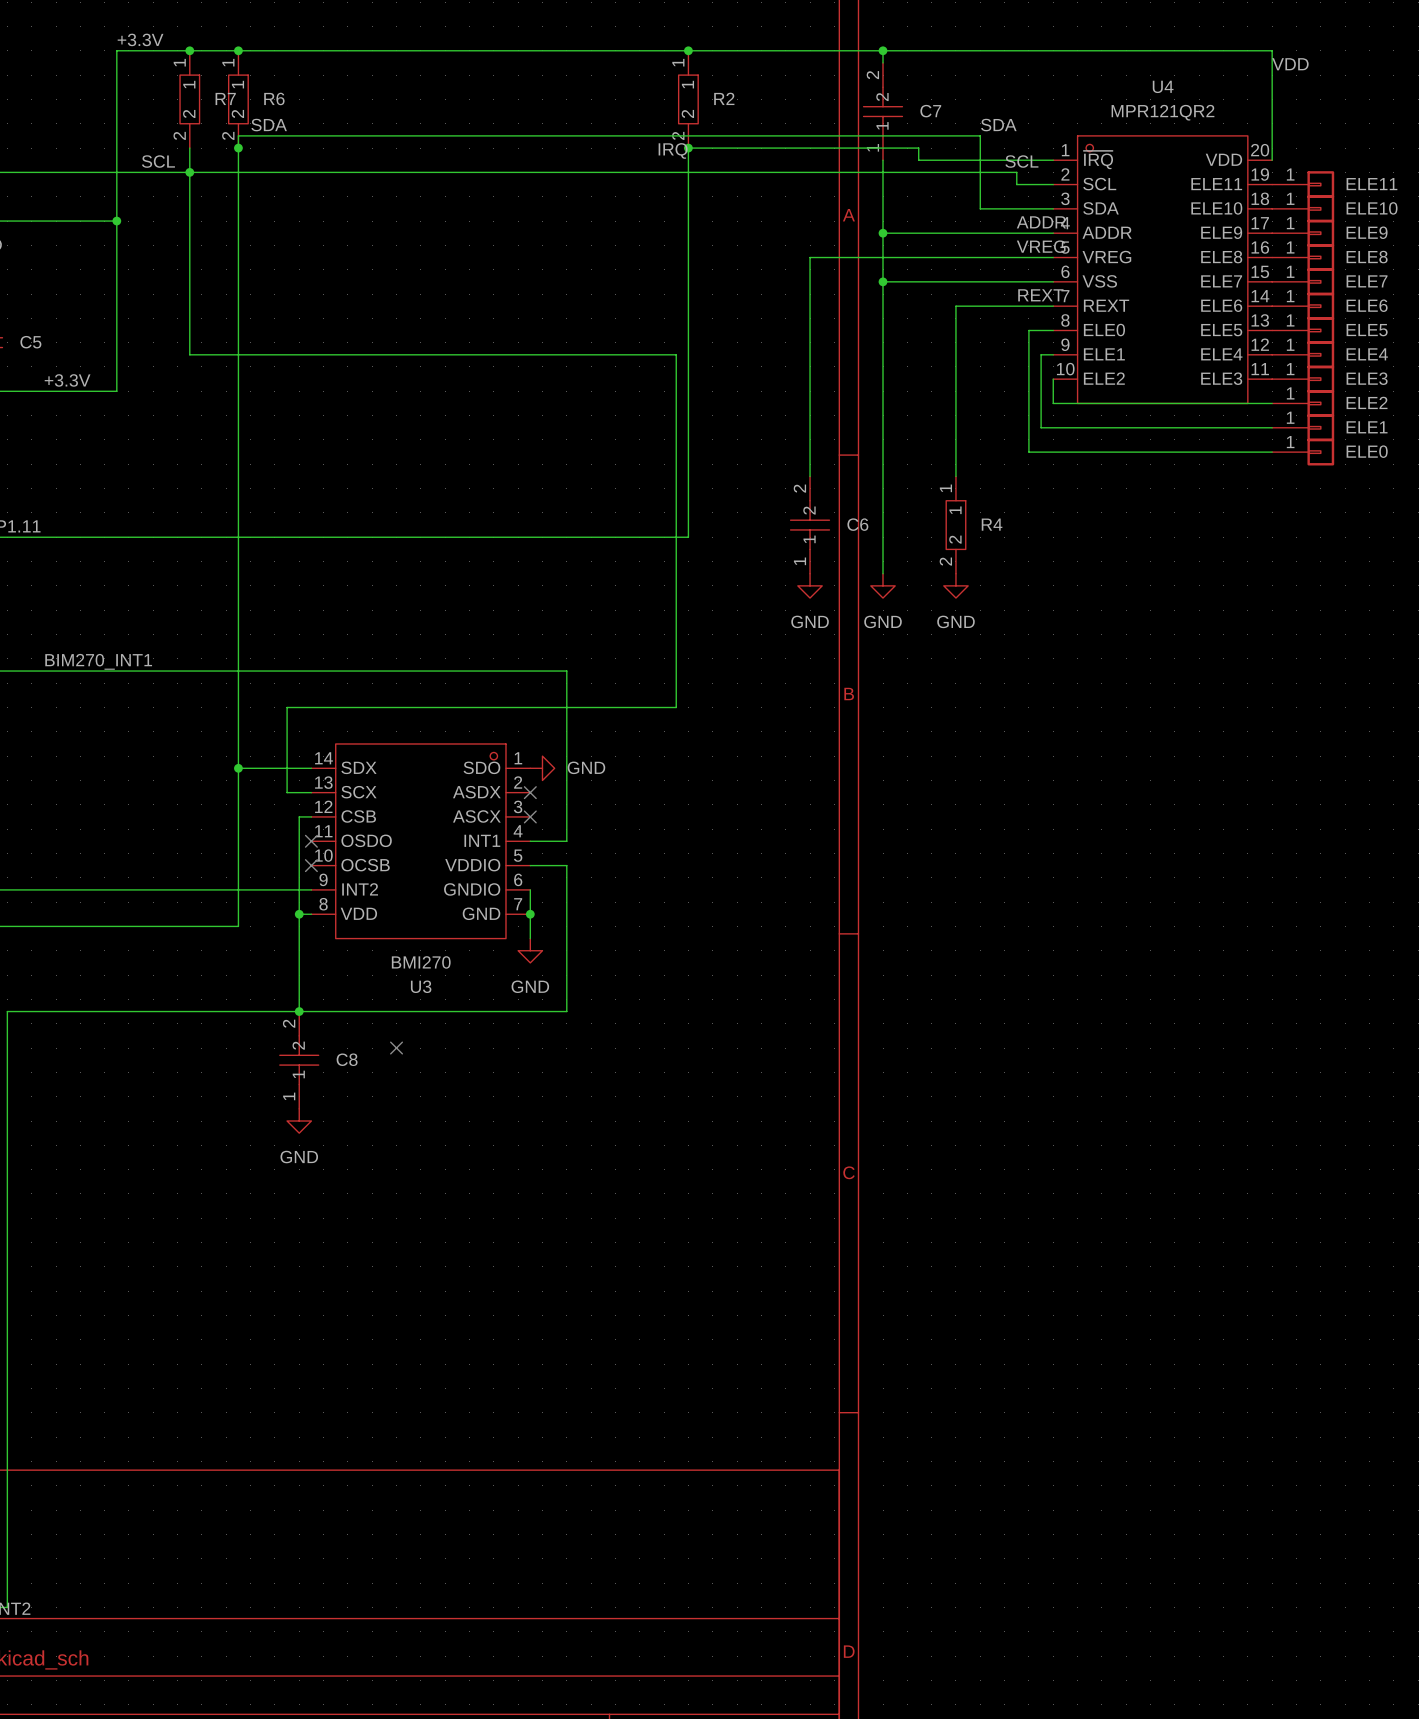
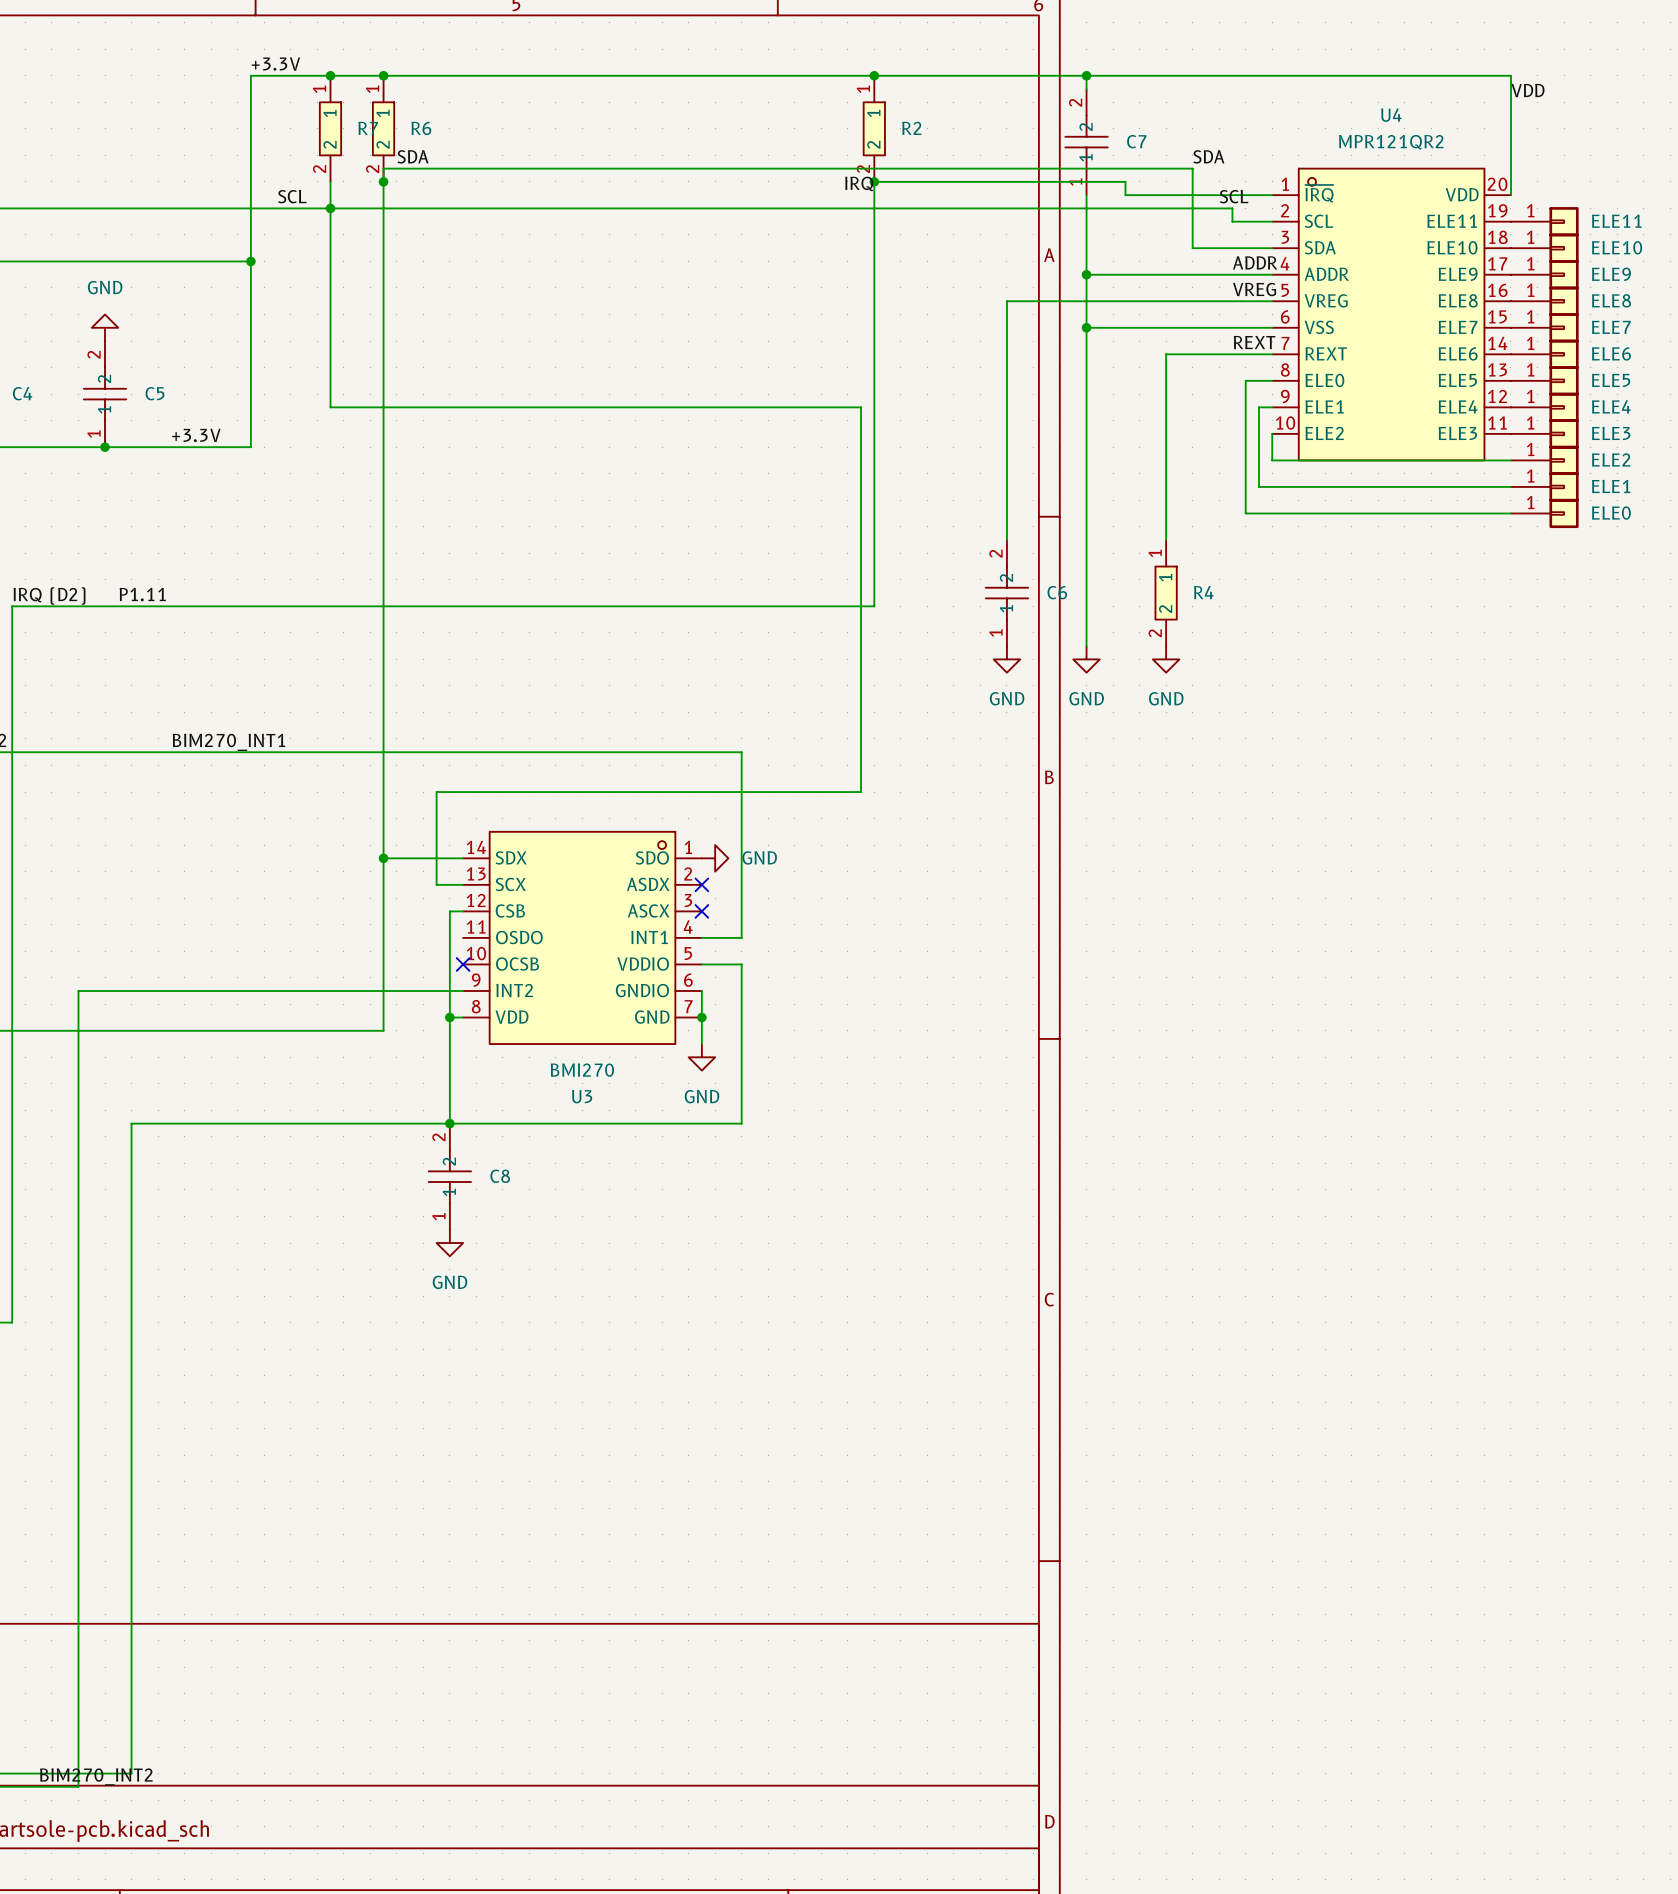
no-connect mark: (311, 841) -> none
no-connect mark: (396, 1048) -> none

